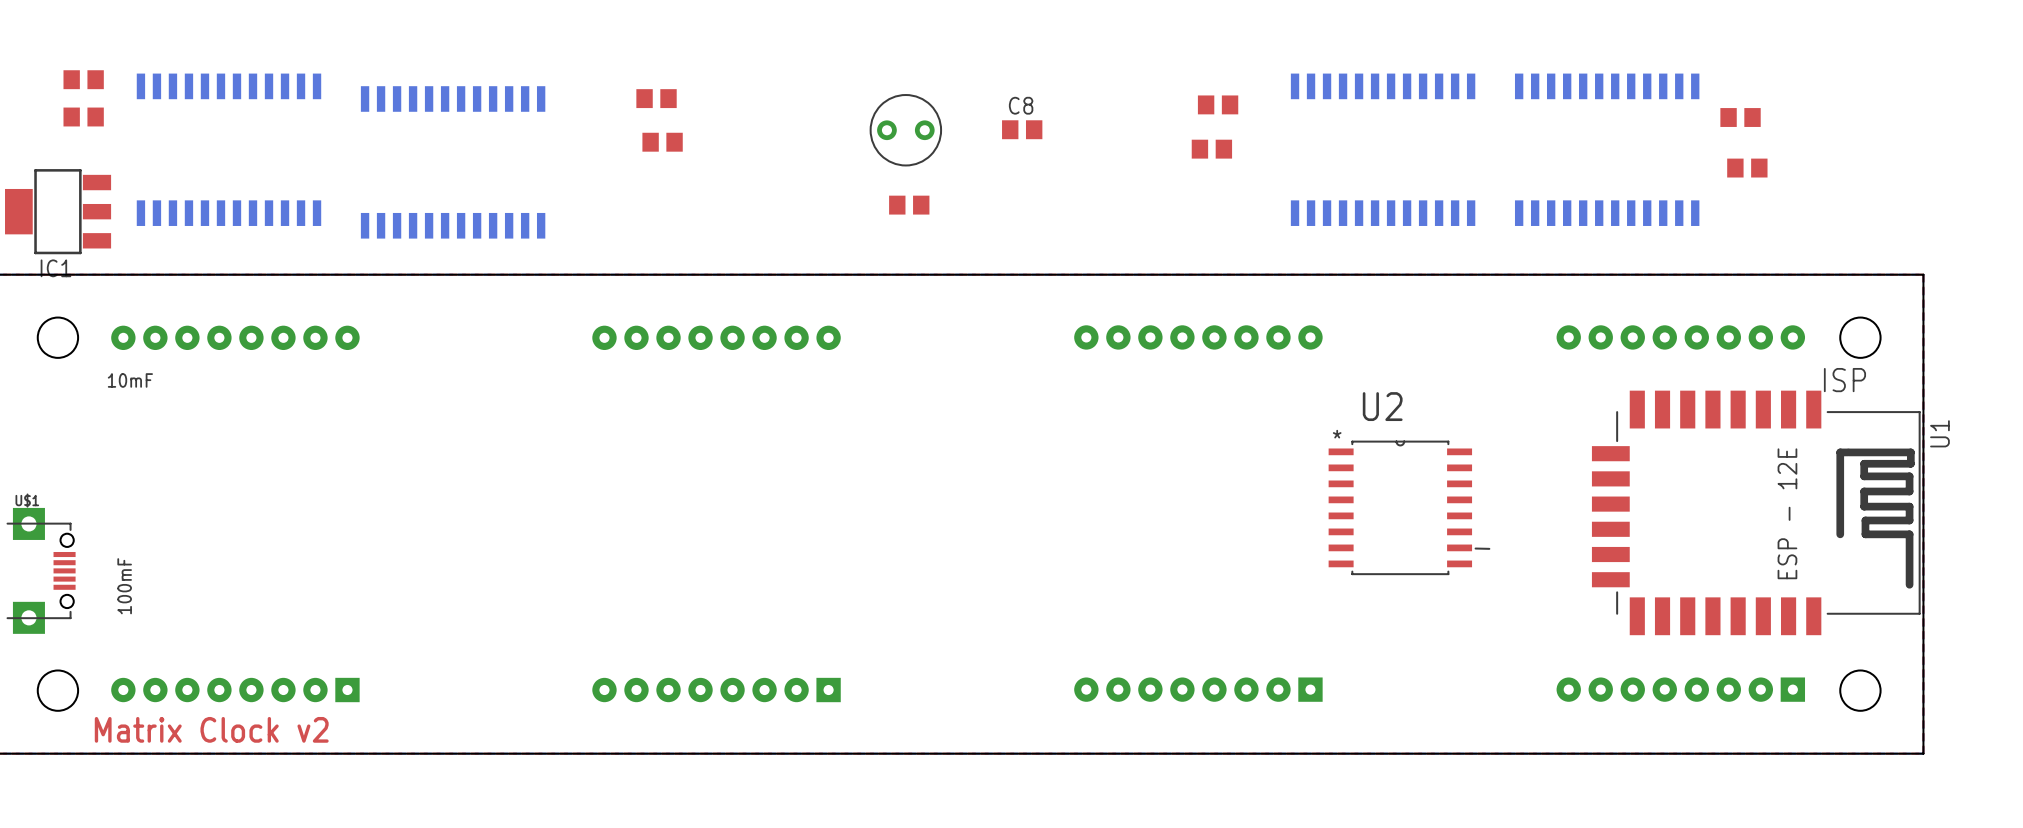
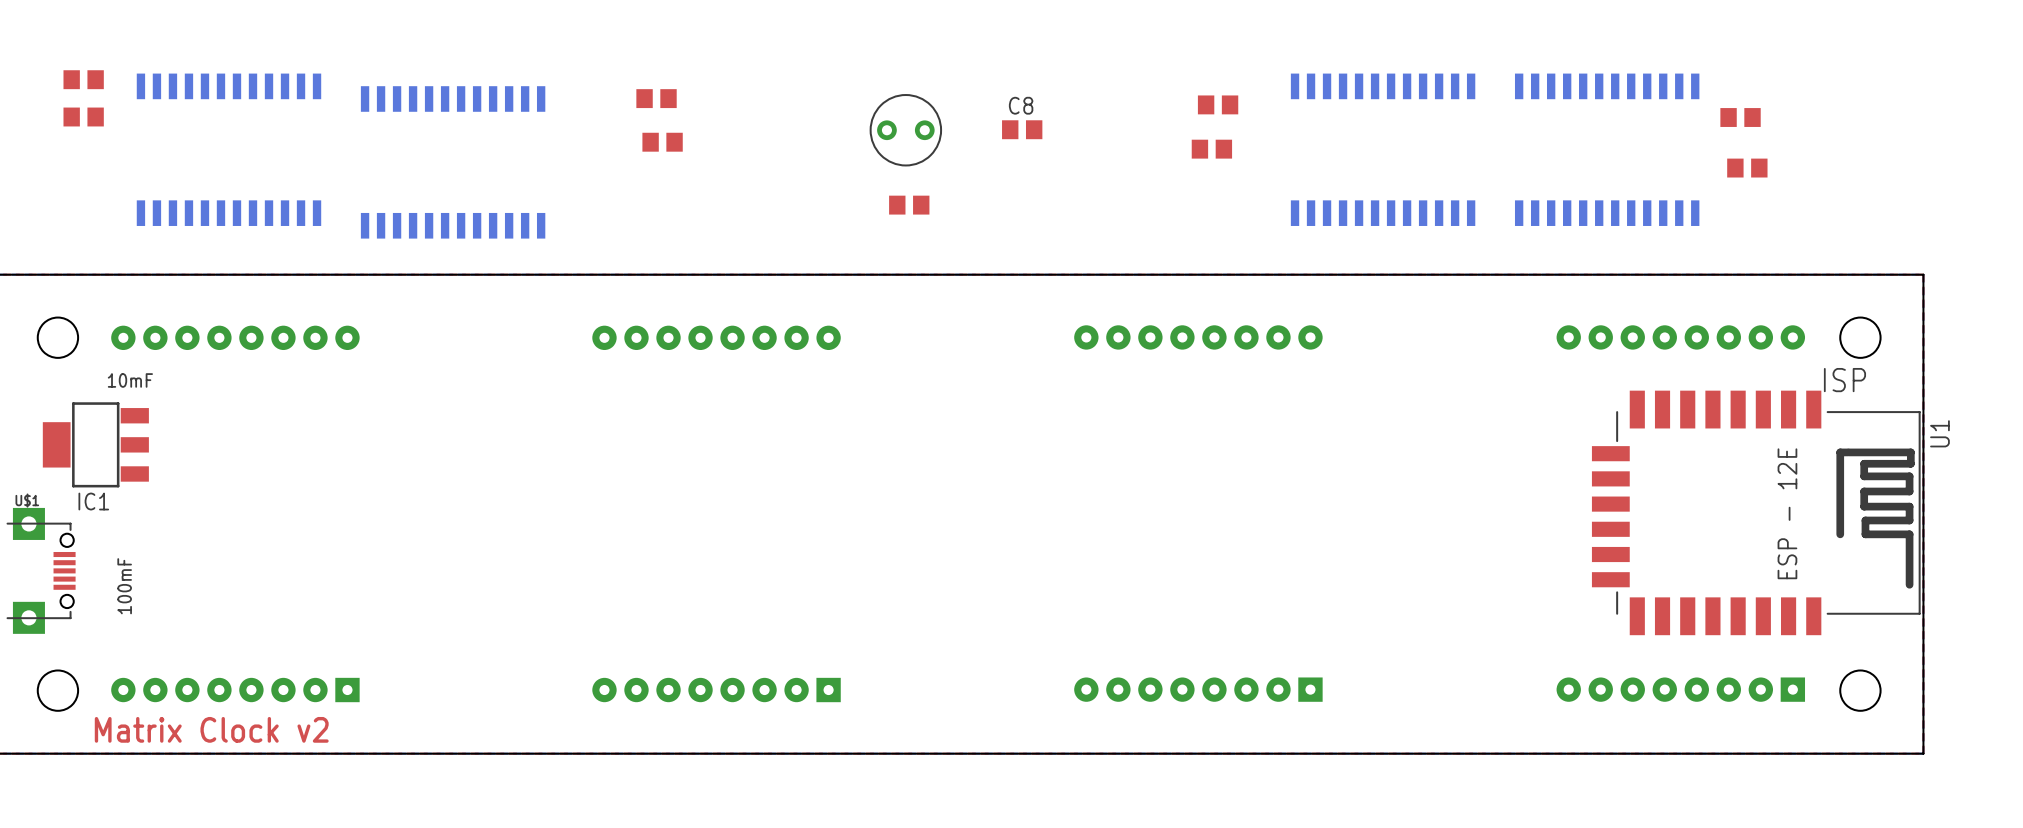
IC1 position: (58, 211) -> (95, 444)
U2: (1409, 507) -> none

